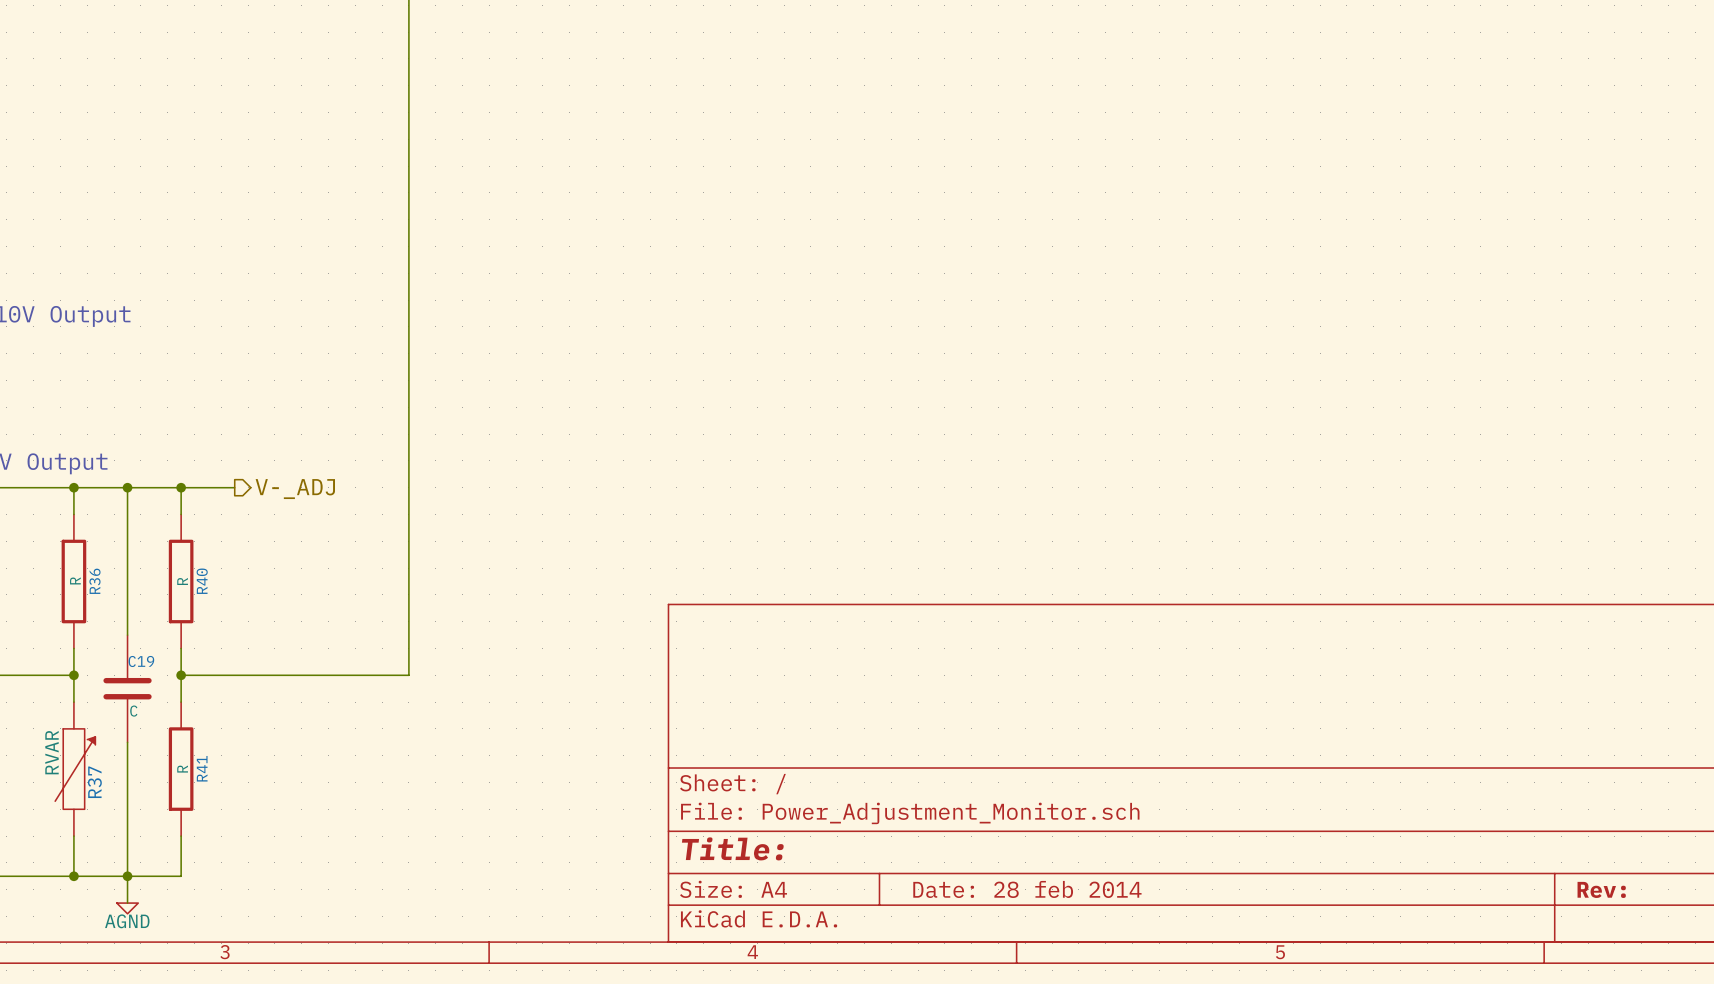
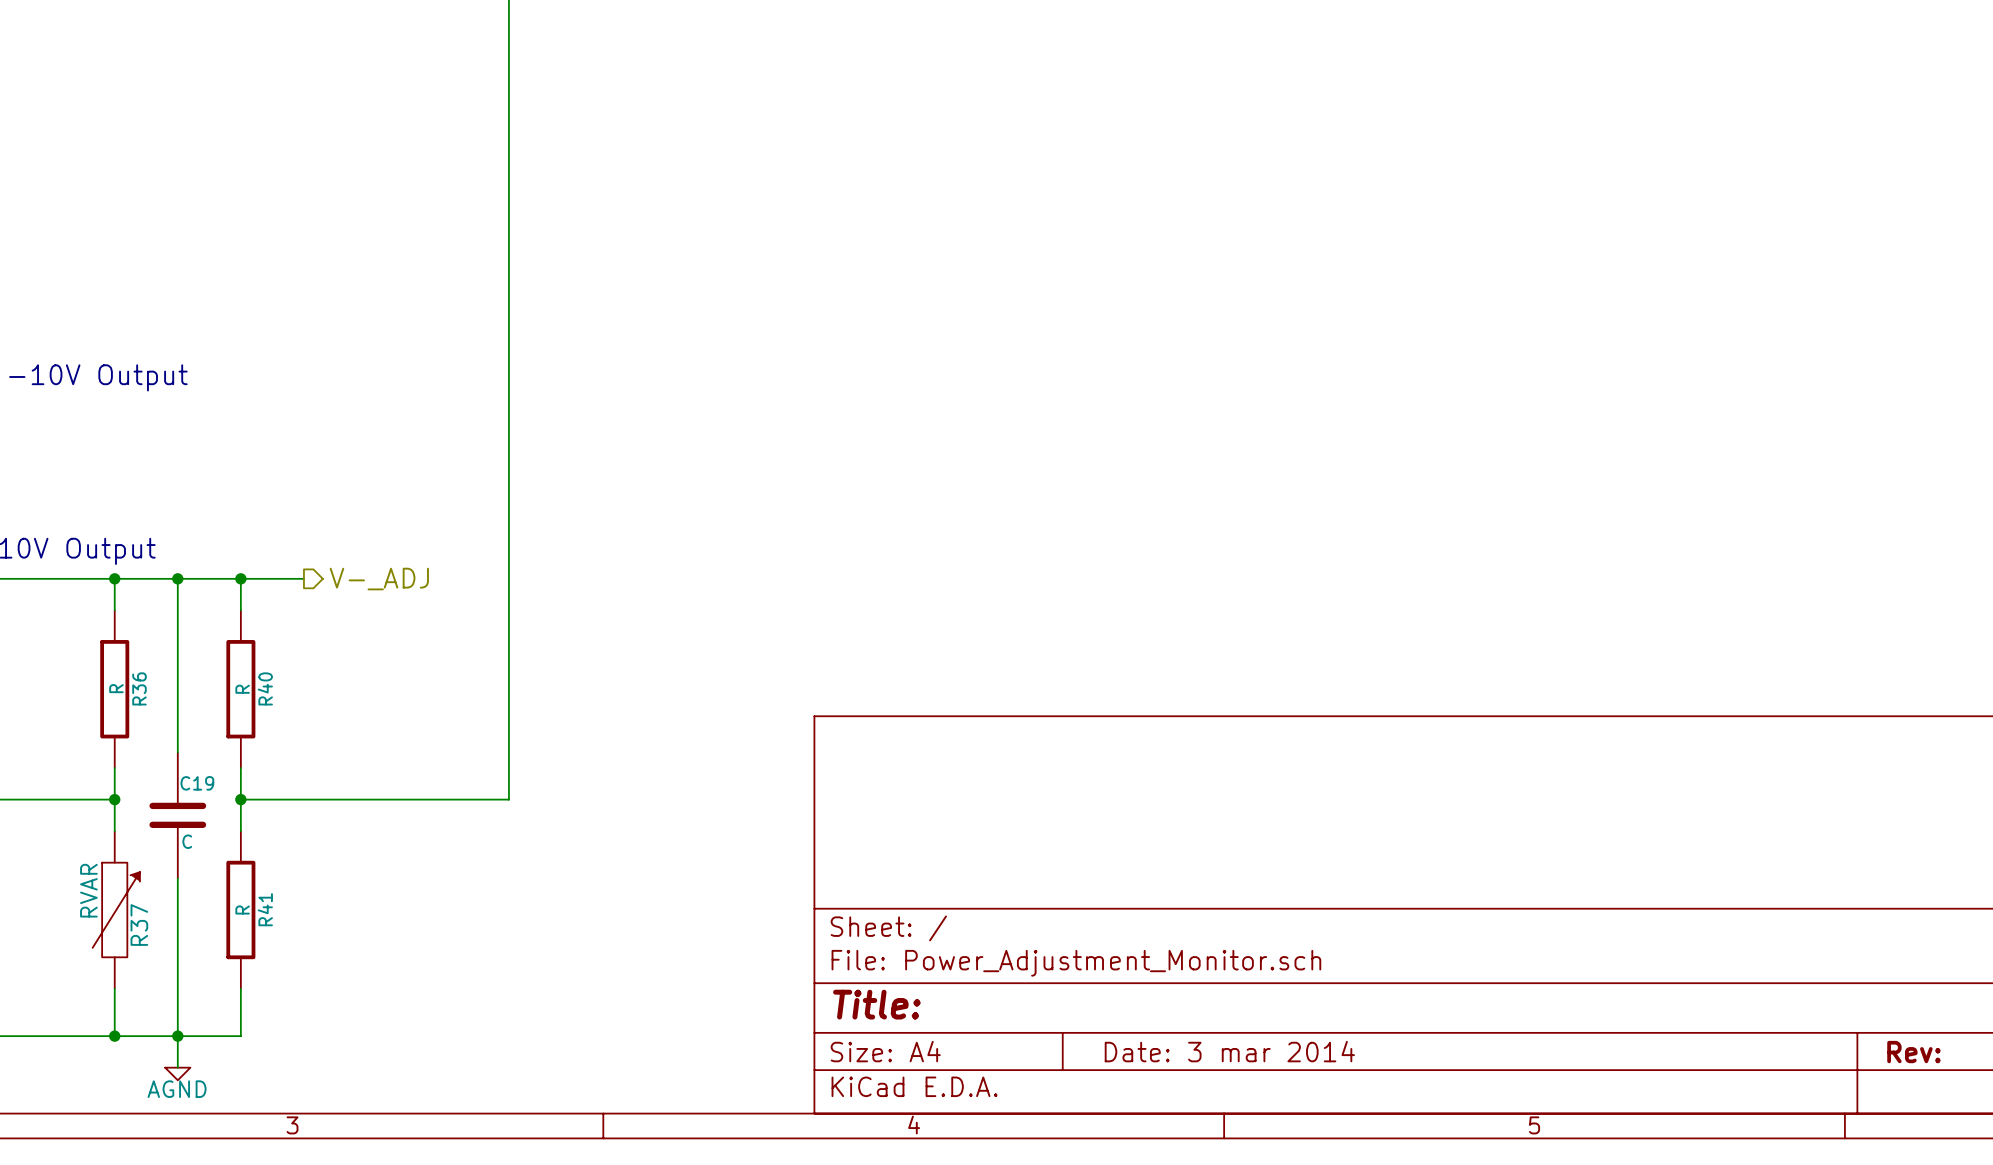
title block: Date: 28 feb 2014 (1027, 889) -> Date: 3 mar 2014 (1229, 1051)

